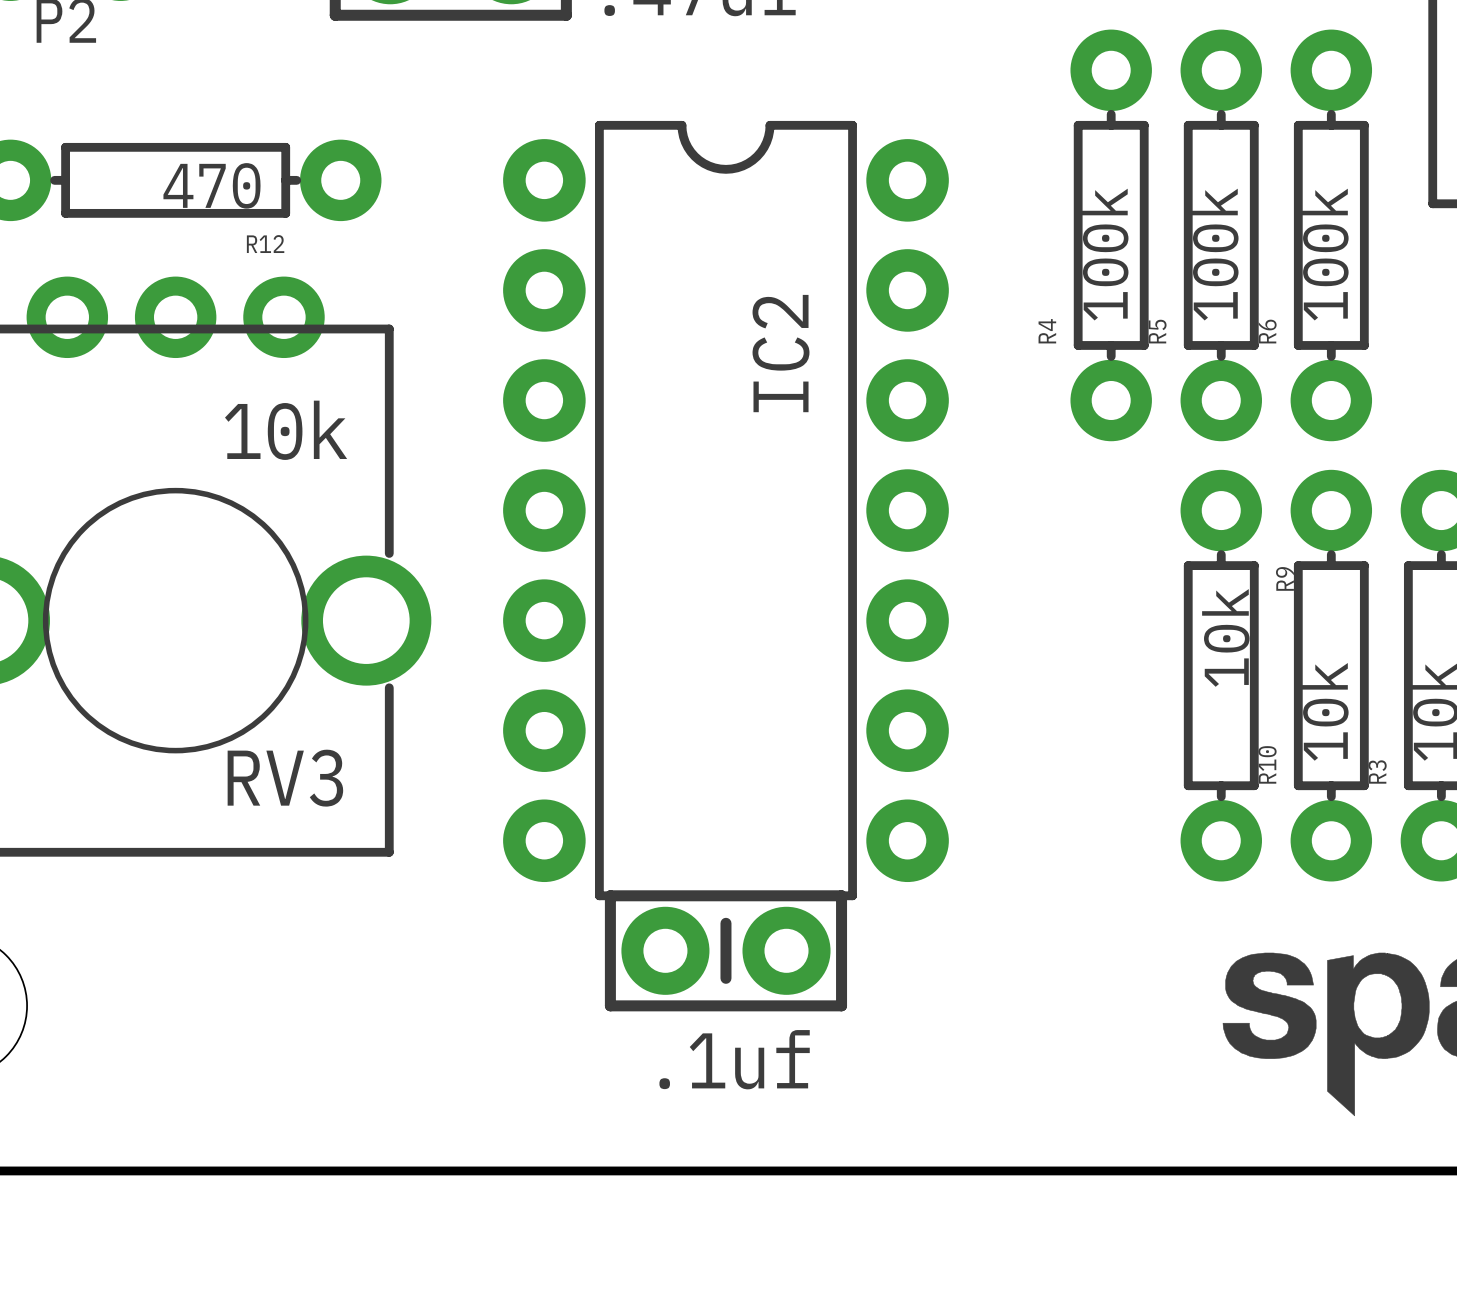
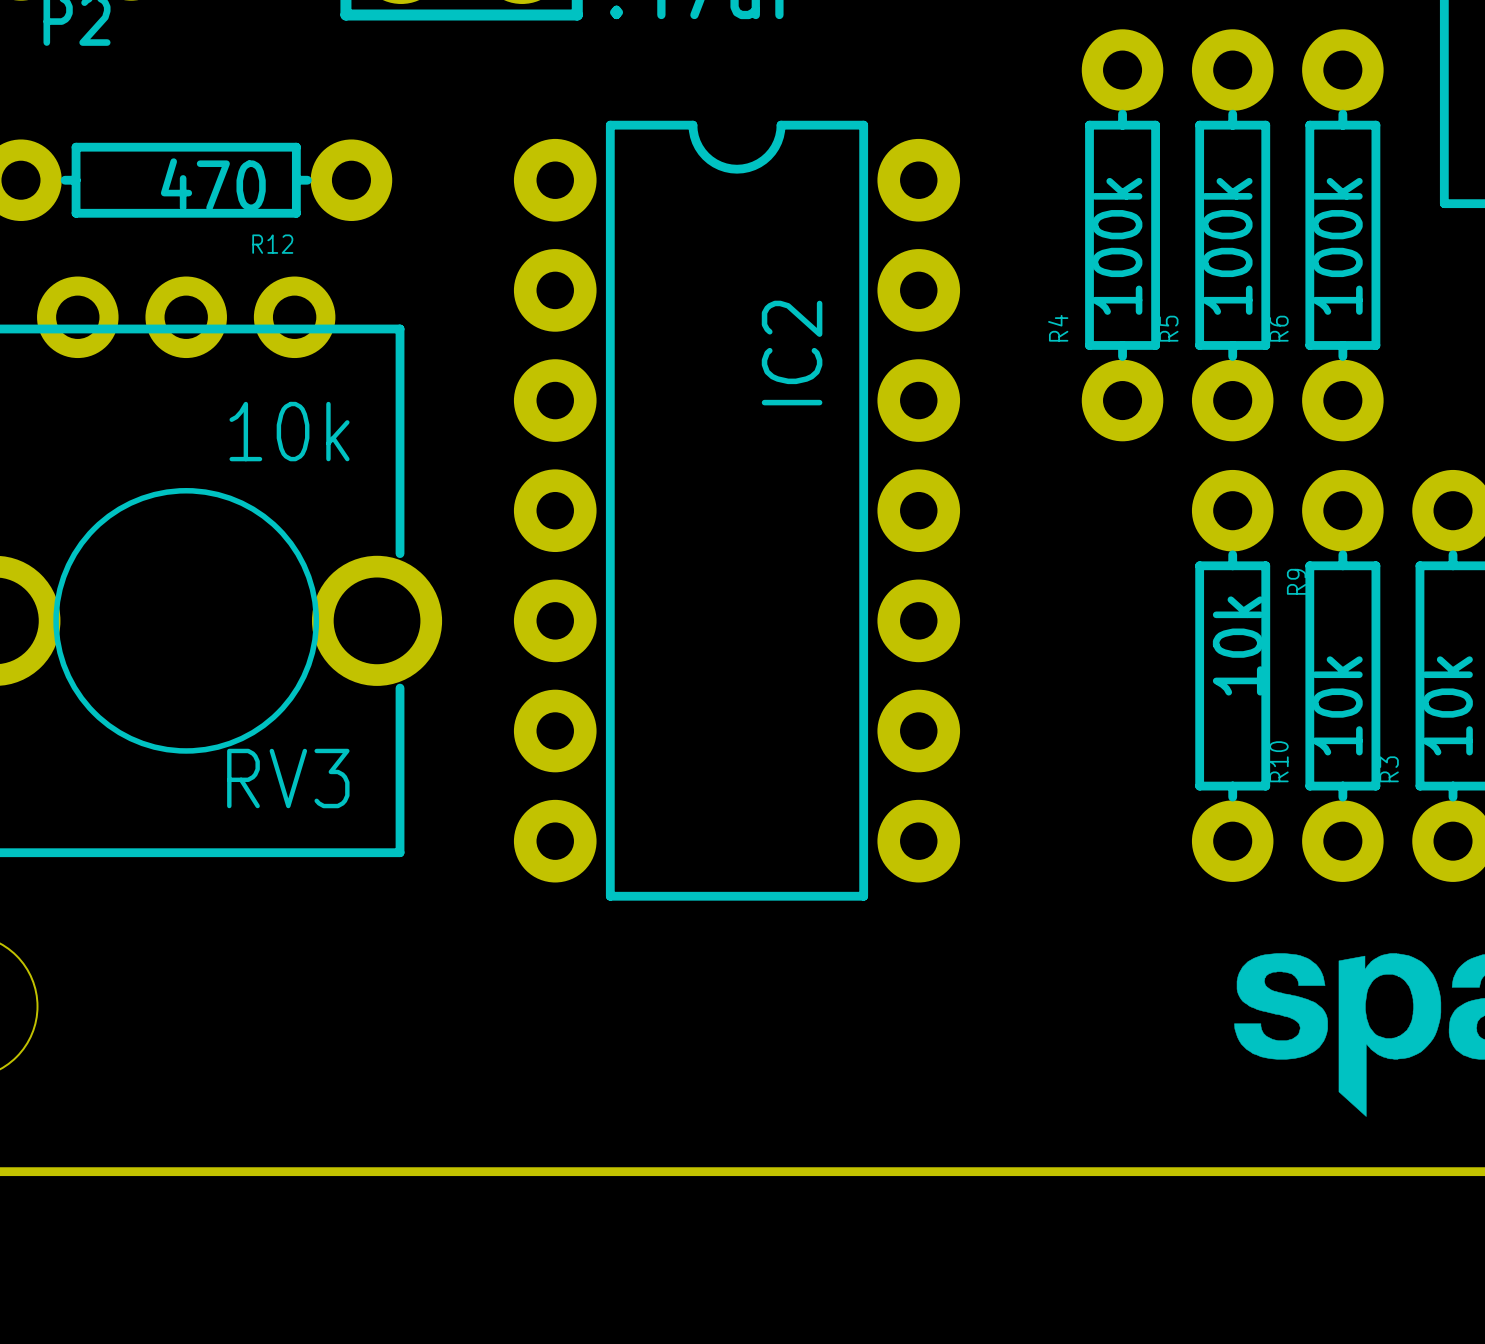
part: (725, 950) -> none
text: .1uf (734, 1059) -> none

